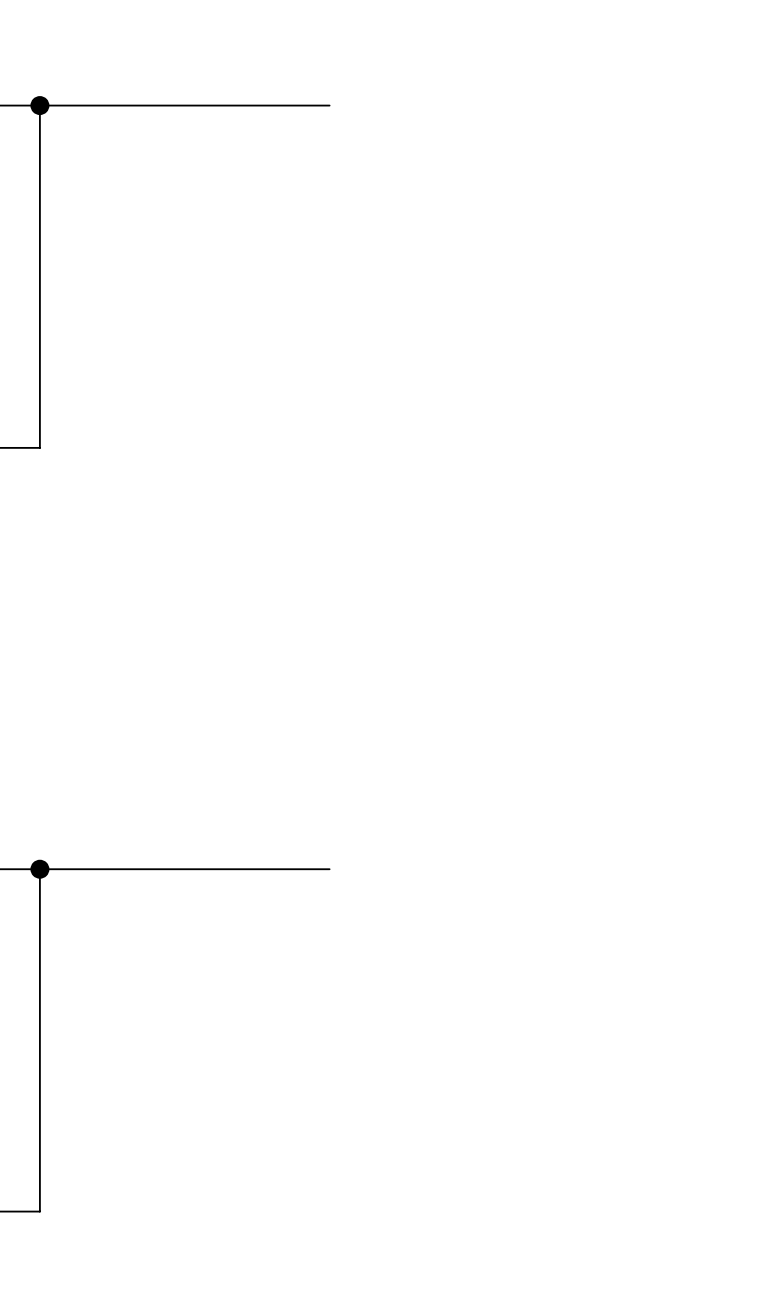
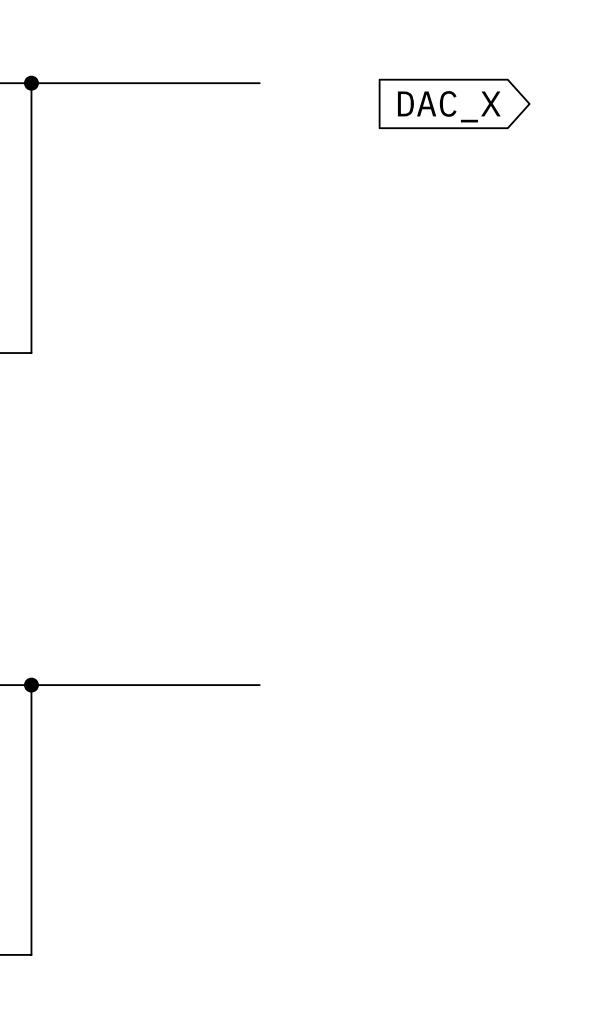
global label: none -> DAC_X (449, 106)

